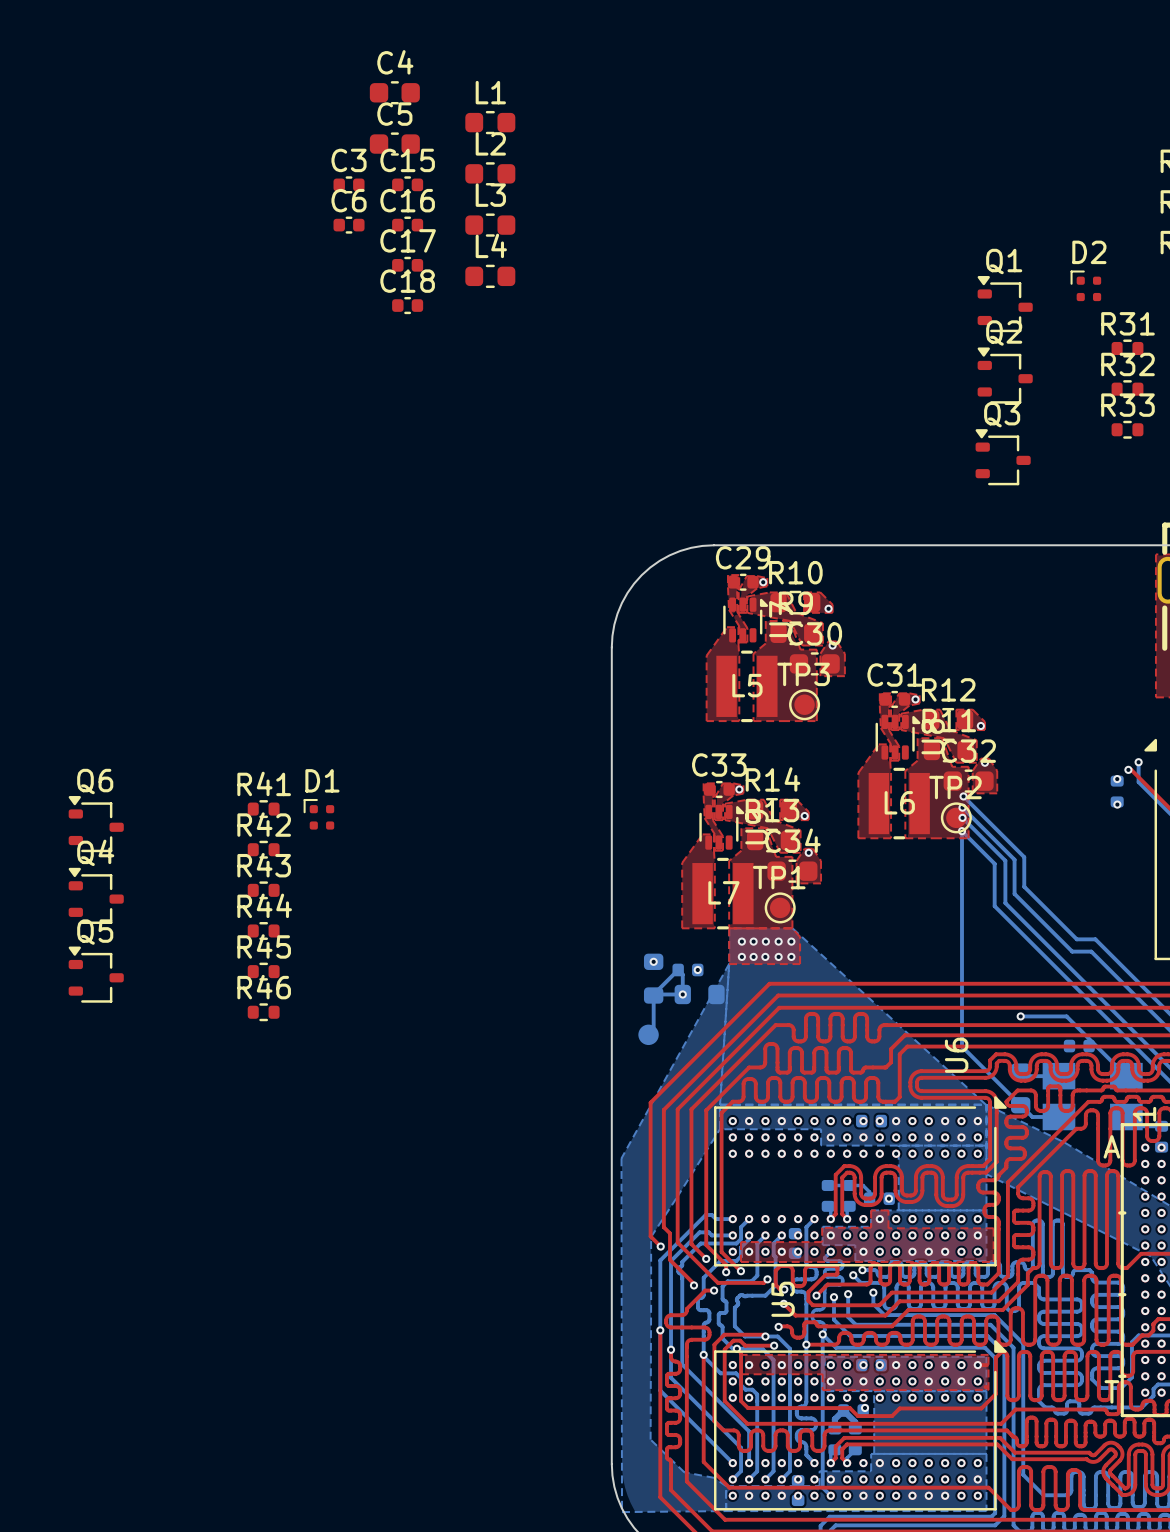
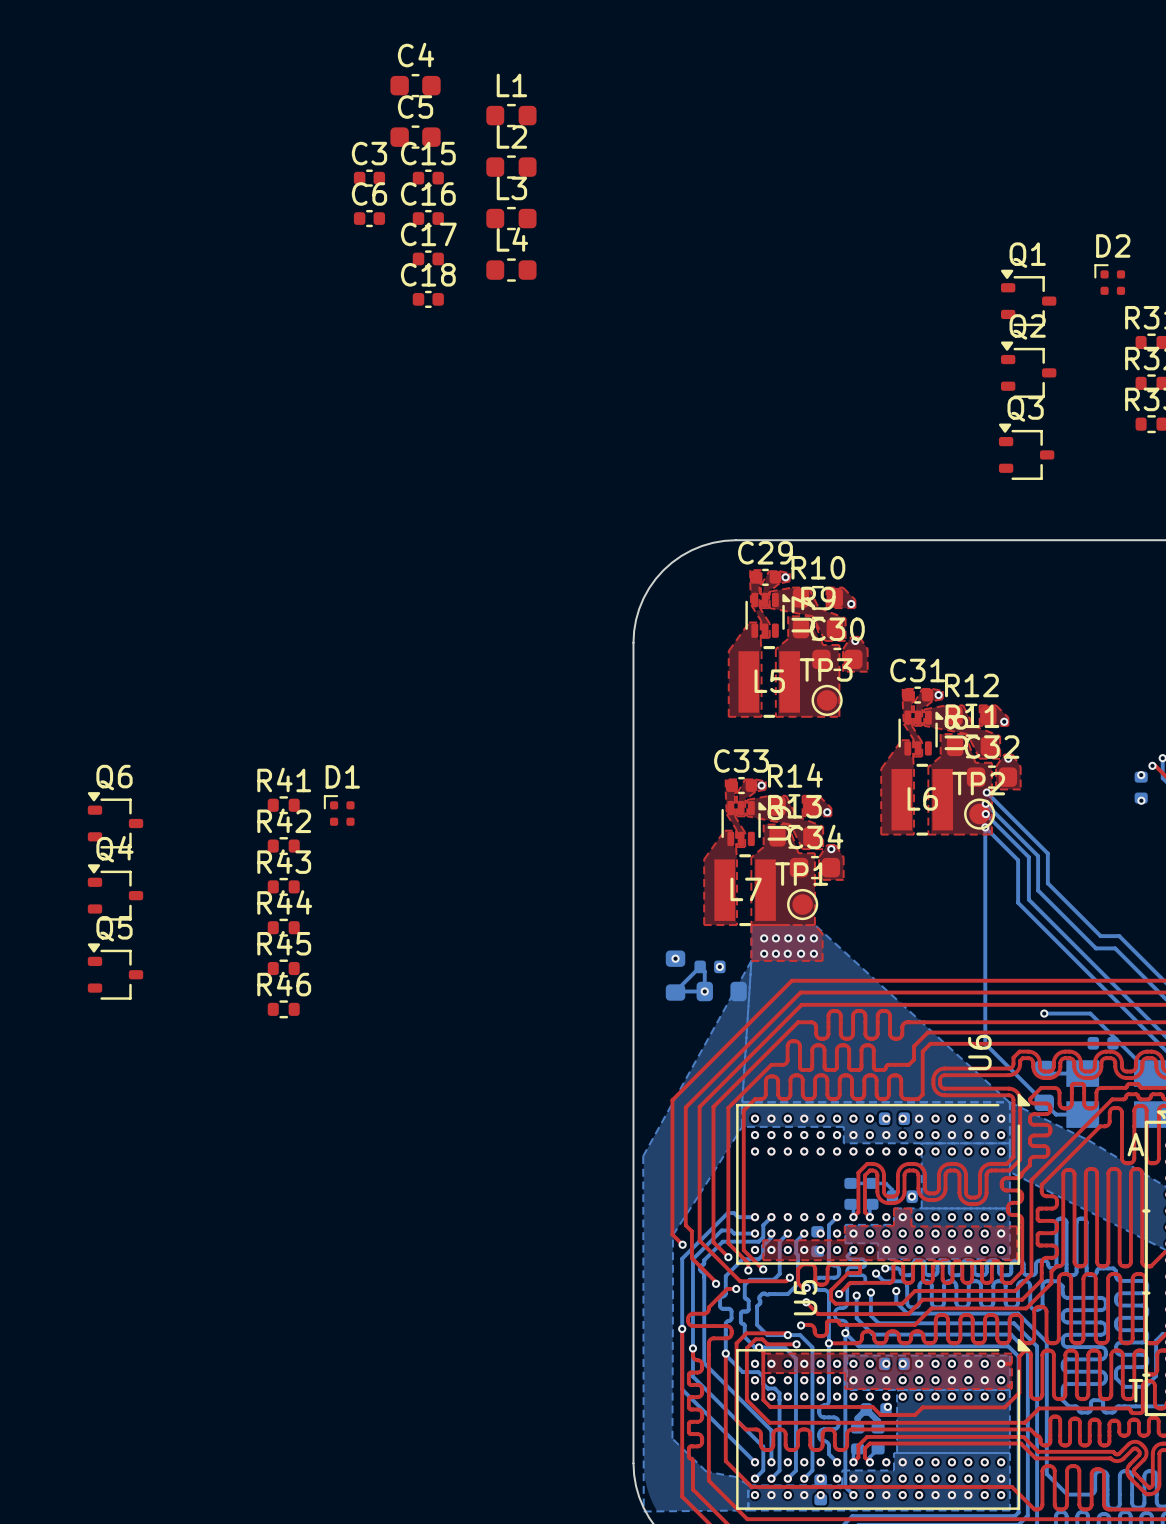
bottom track: (653, 995) (653, 1029) (648, 1034) -> none
part: (648, 1034) -> none

